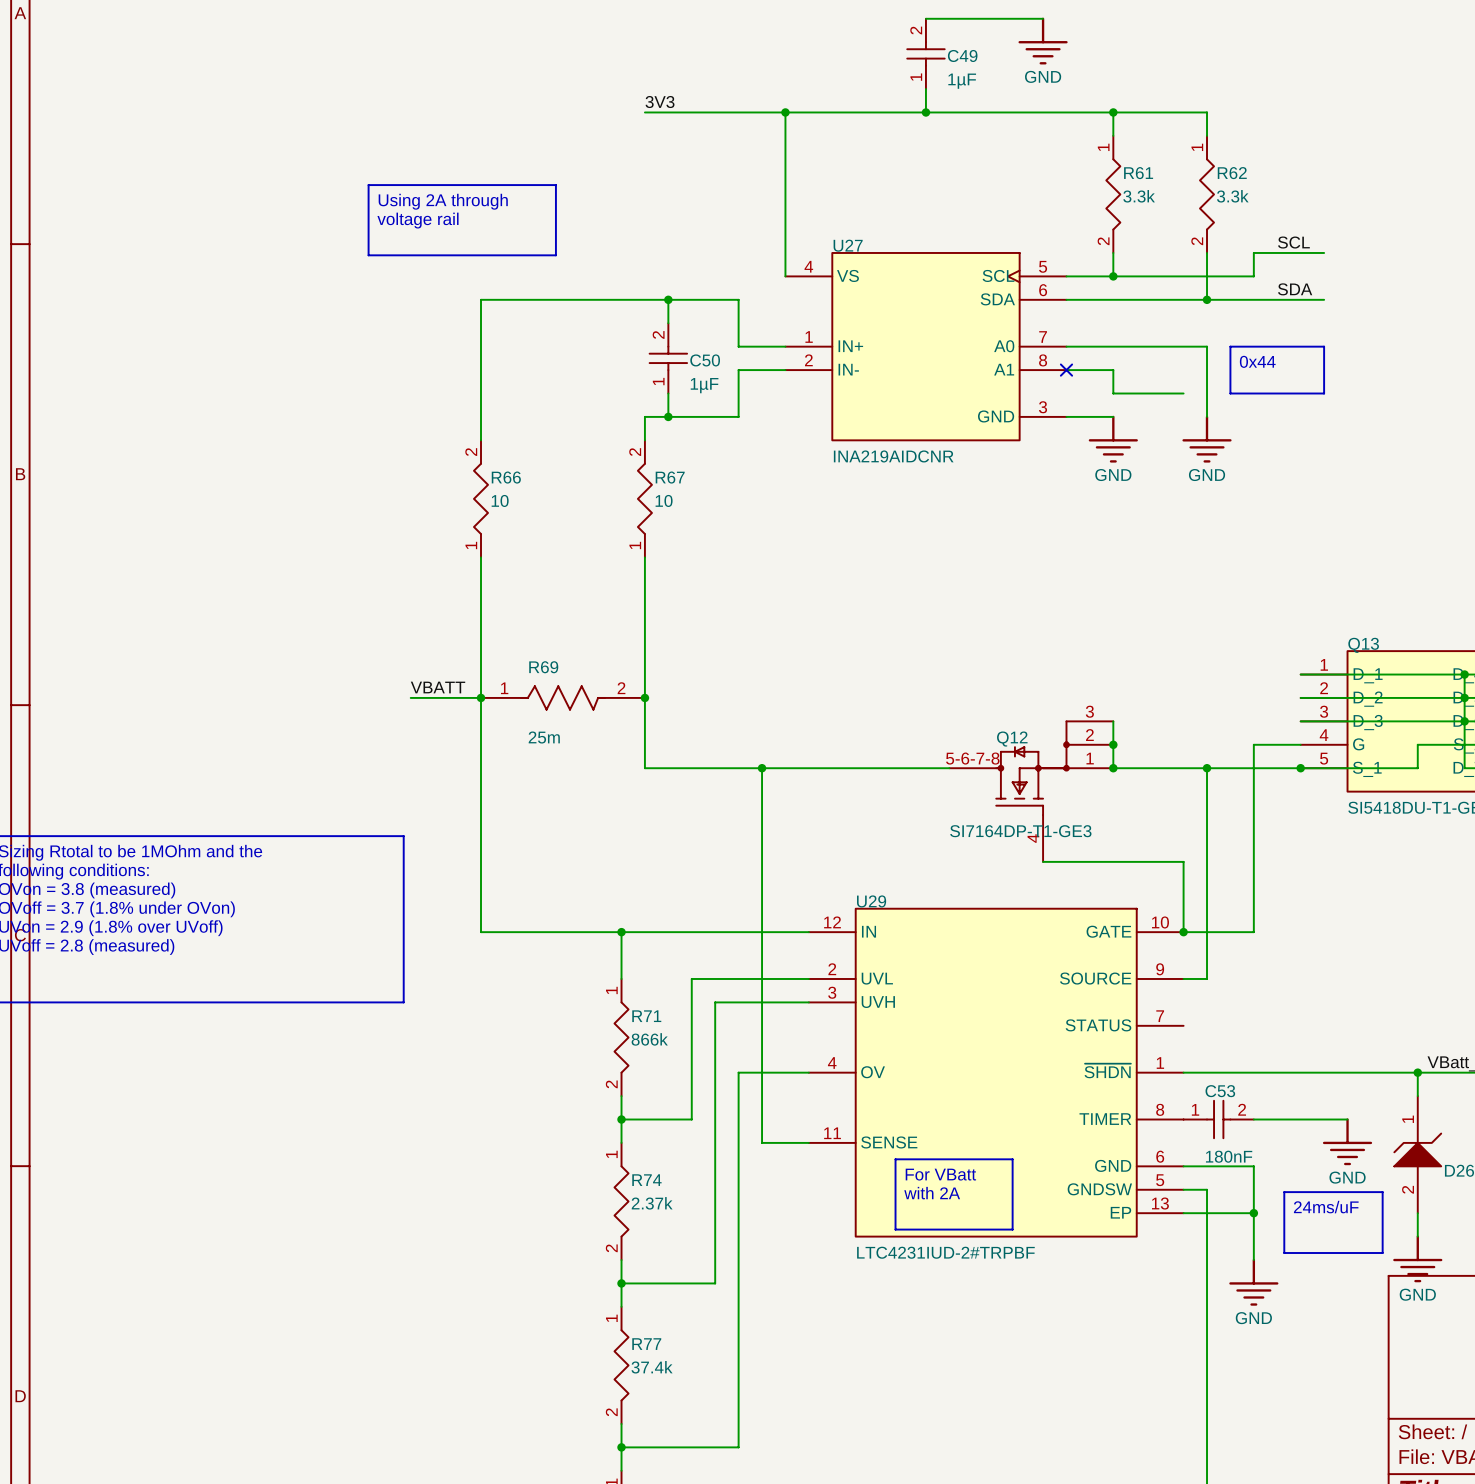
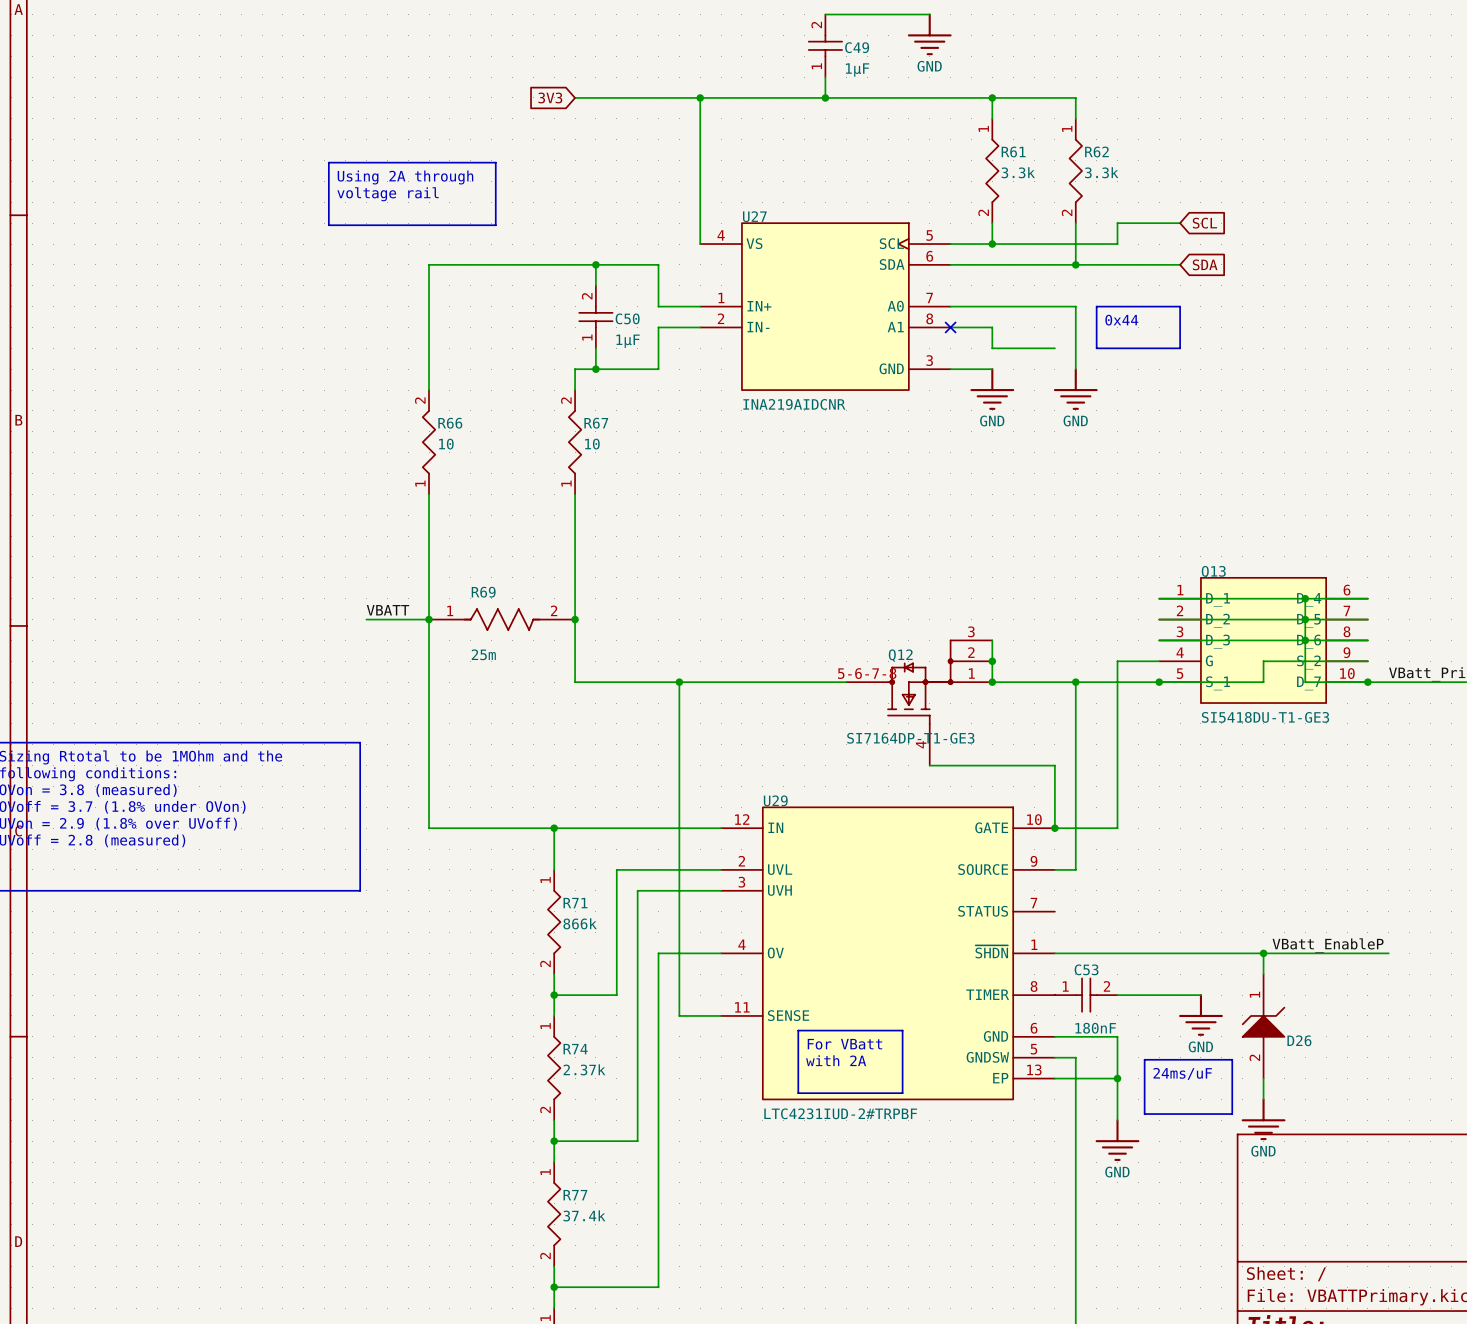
label: 3V3 (660, 102) -> none
global label: none -> 3V3 (550, 97)
label: SCL (1293, 242) -> none
global label: none -> SCL (1204, 223)
label: SDA (1295, 289) -> none
global label: none -> SDA (1205, 264)

